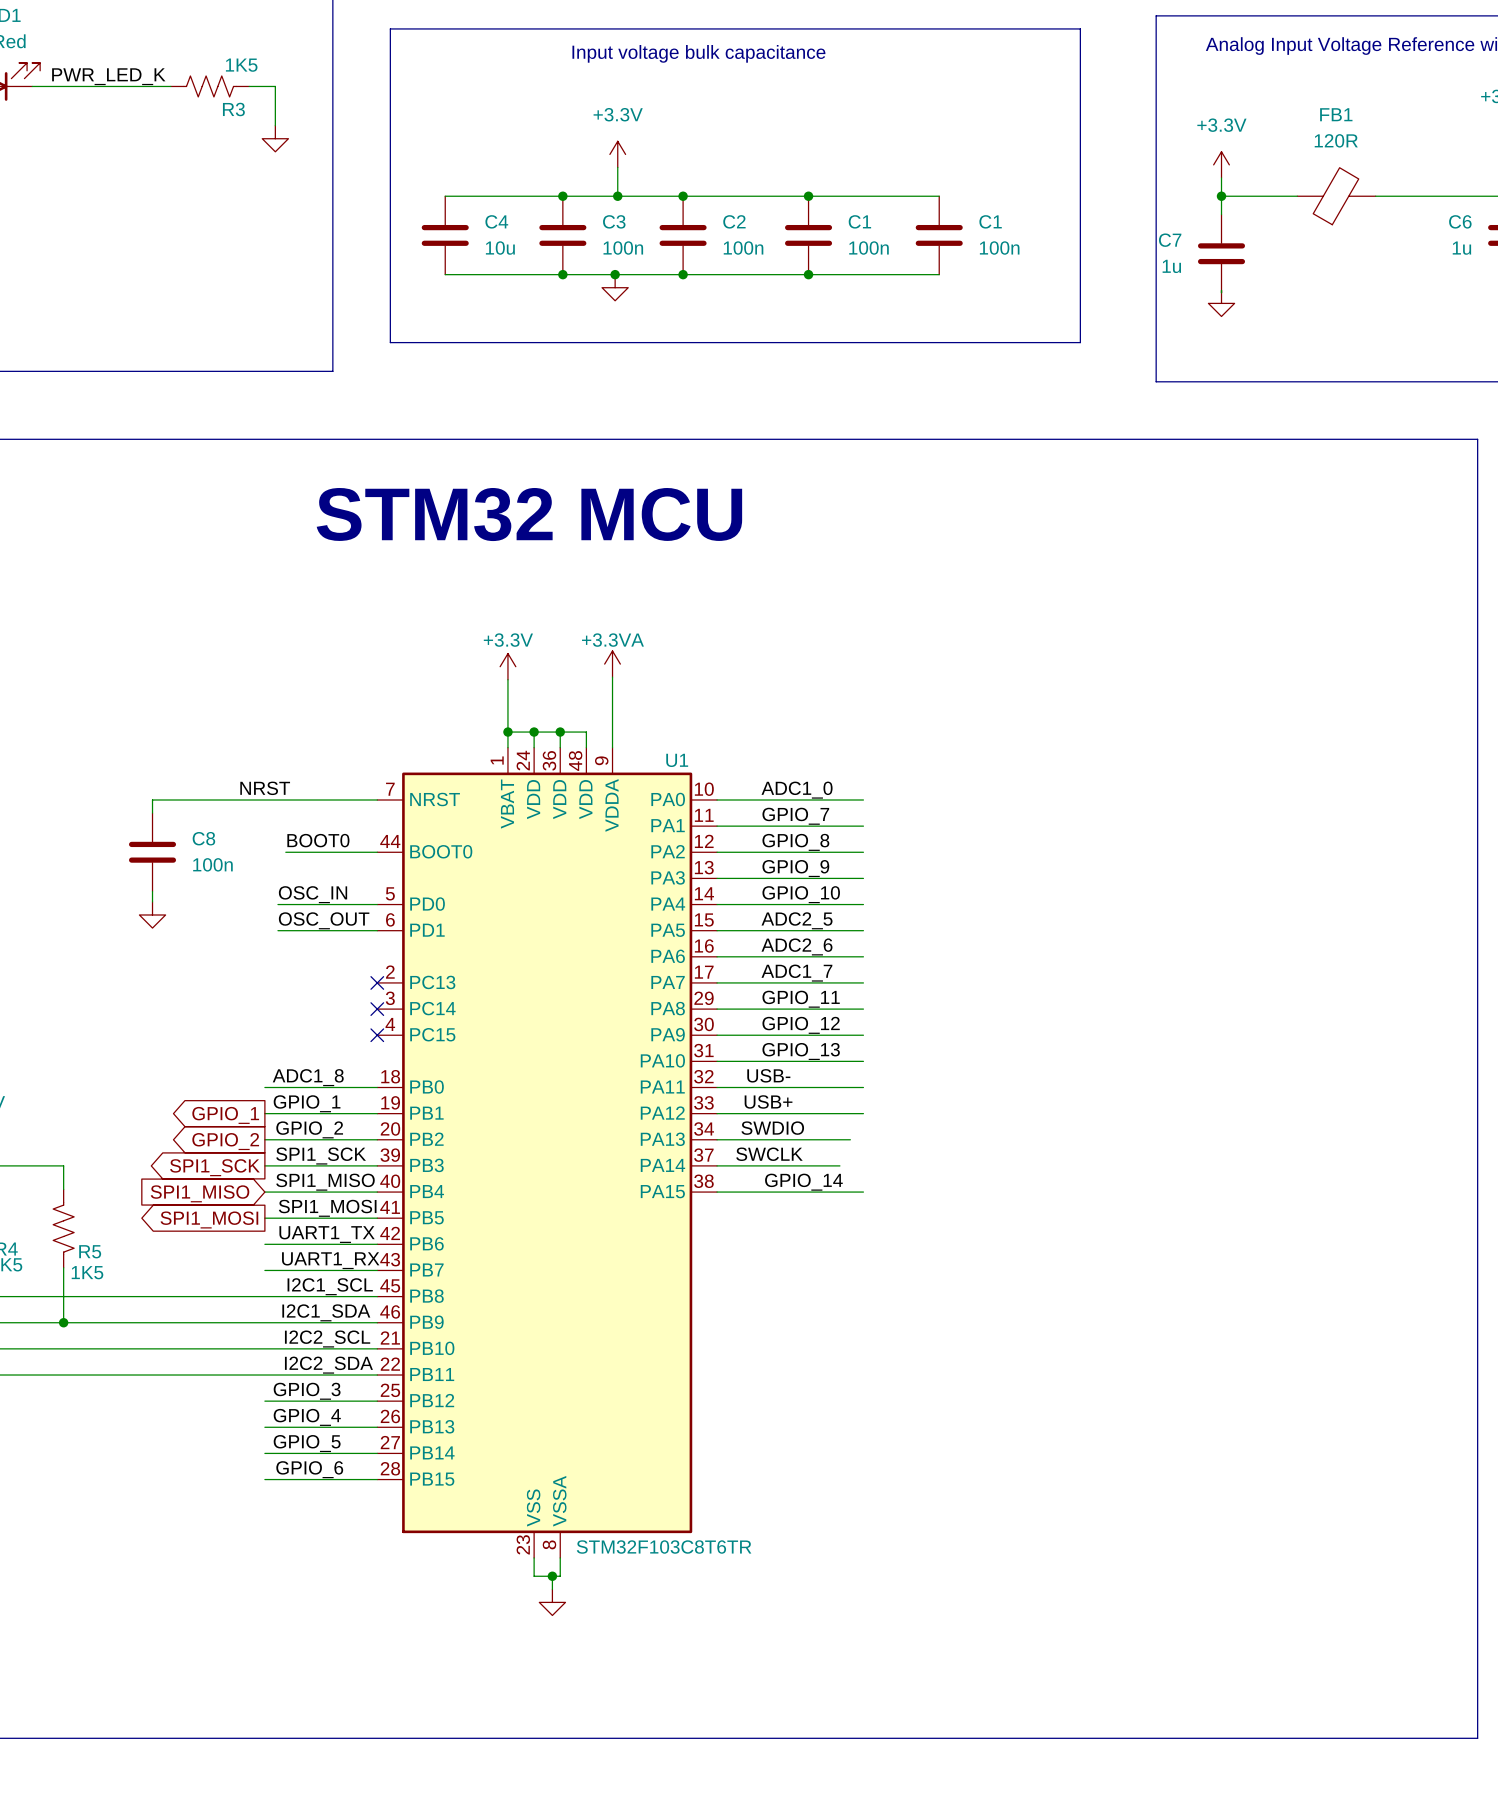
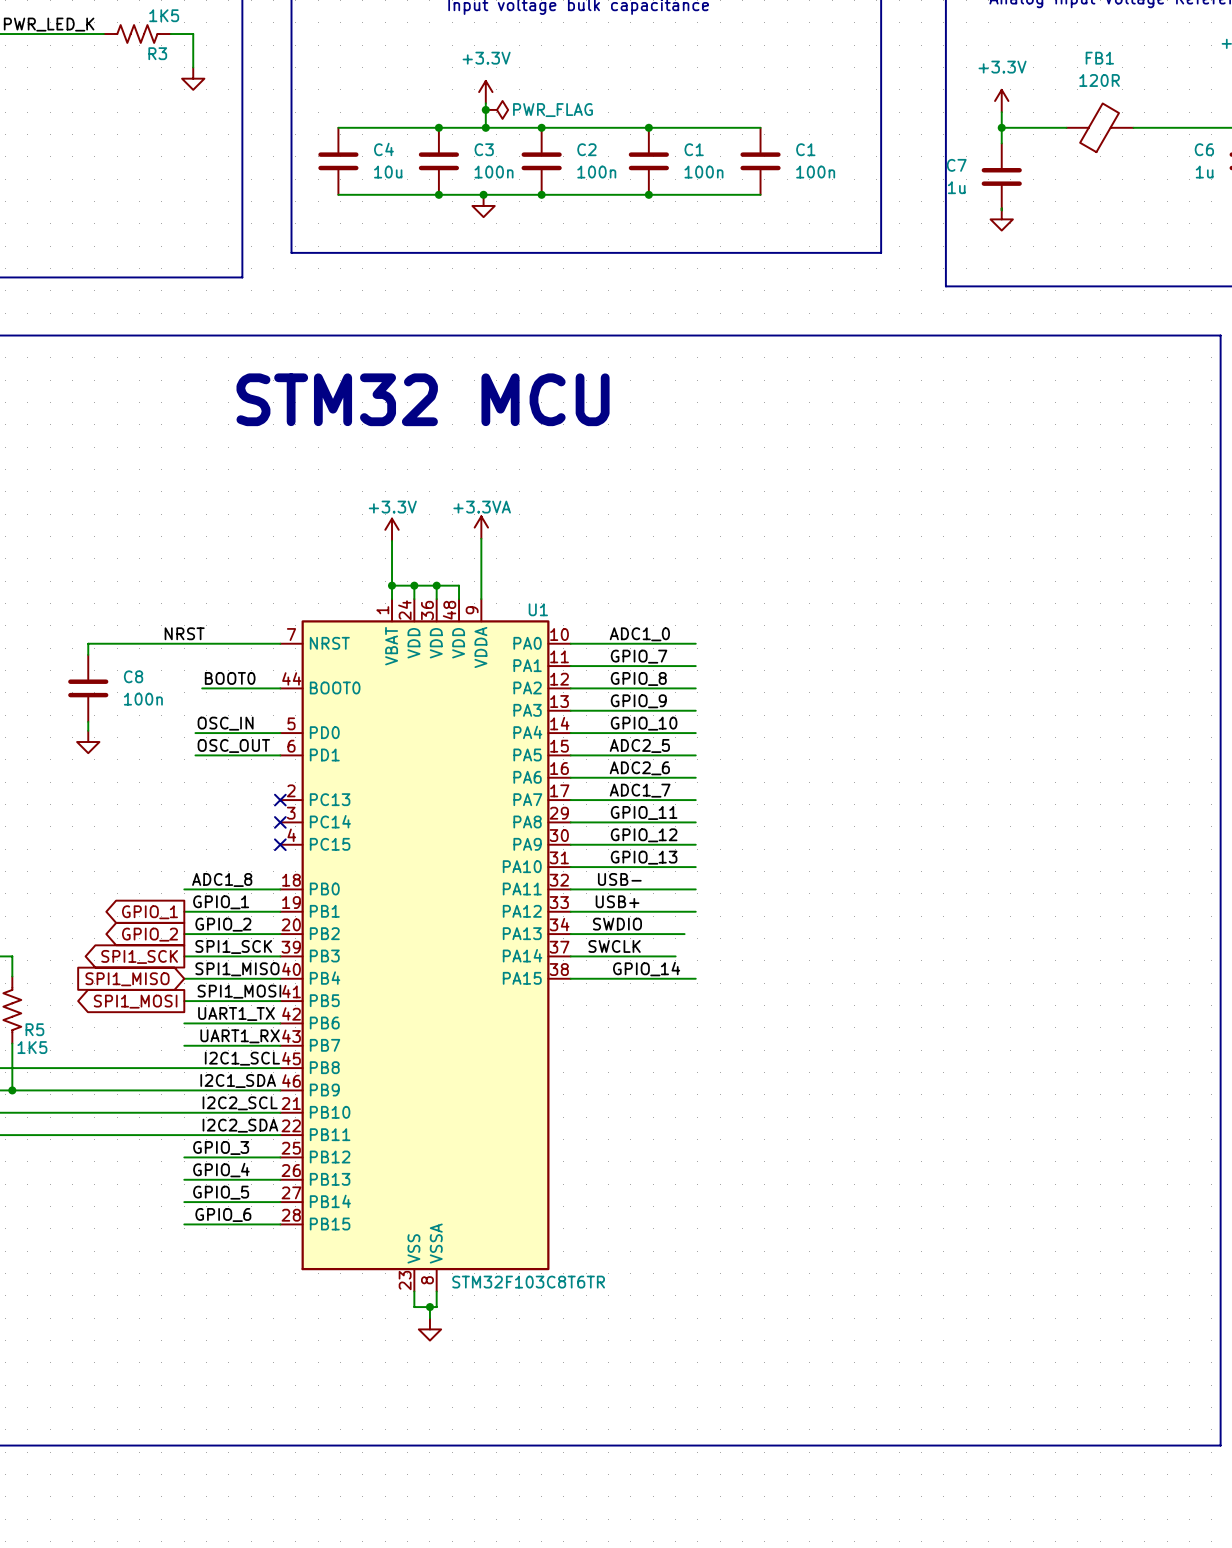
junction: none -> (485, 109)
power symbol: none -> PWR_FLAG (496, 109)

